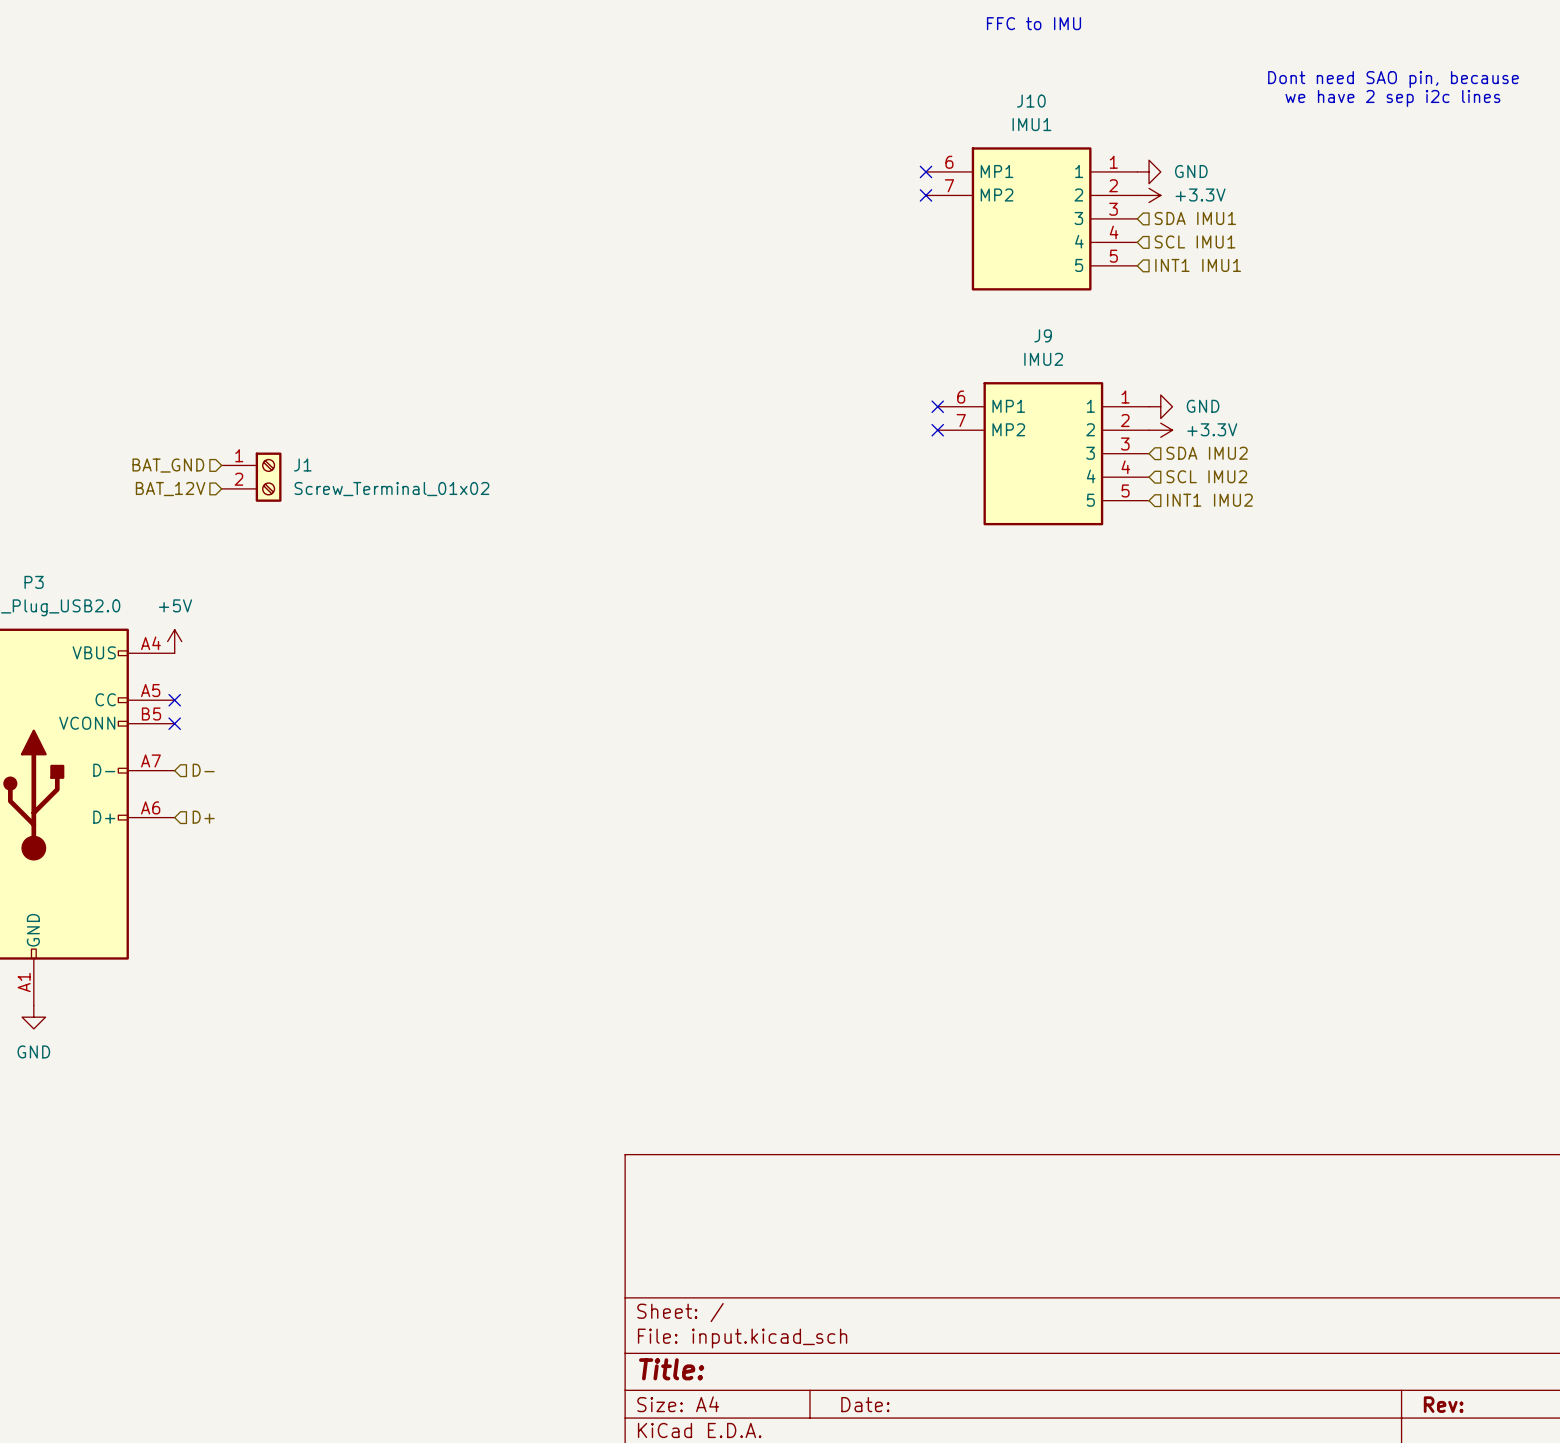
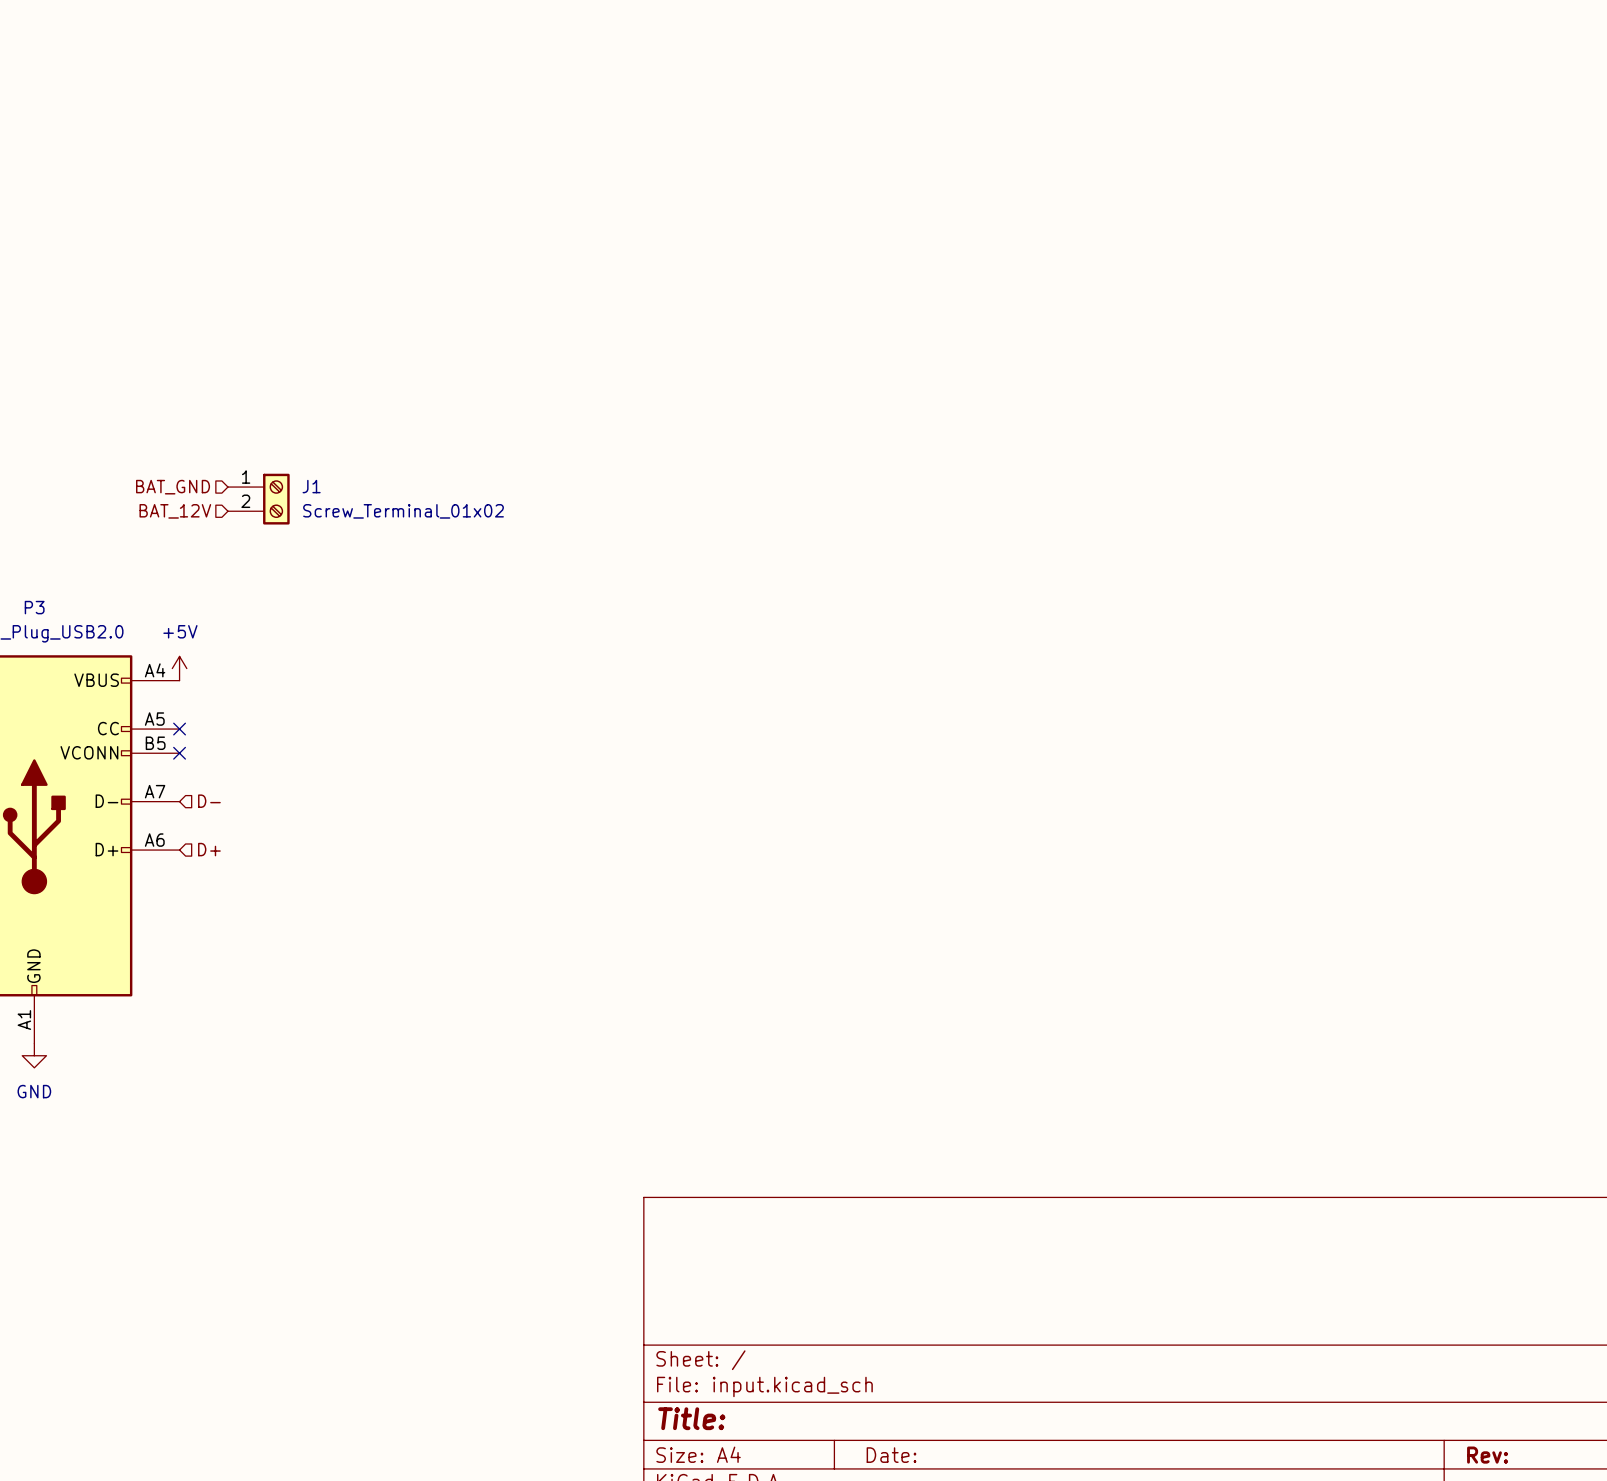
text: FFC to IMU (1033, 23) -> none
text: Dont need SAO pin, because (1393, 79) -> none
text: we have 2 sep i2c lines (1392, 98) -> none
no-connect mark: (925, 171) -> none
power symbol: GND (1149, 171) -> none
no-connect mark: (925, 195) -> none
power symbol: +3.3V (1149, 195) -> none
J10: IMU1 (1031, 218) -> none
hierarchical label: SDA IMU1 (1195, 218) -> none
hierarchical label: SCL IMU1 (1195, 241) -> none
hierarchical label: INT1 IMU1 (1198, 265) -> none
no-connect mark: (937, 406) -> none
power symbol: GND (1160, 406) -> none
no-connect mark: (937, 430) -> none
power symbol: +3.3V (1160, 430) -> none
J9: IMU2 (1043, 453) -> none
hierarchical label: SDA IMU2 (1207, 453) -> none
hierarchical label: SCL IMU2 (1206, 476) -> none
hierarchical label: INT1 IMU2 (1209, 500) -> none

